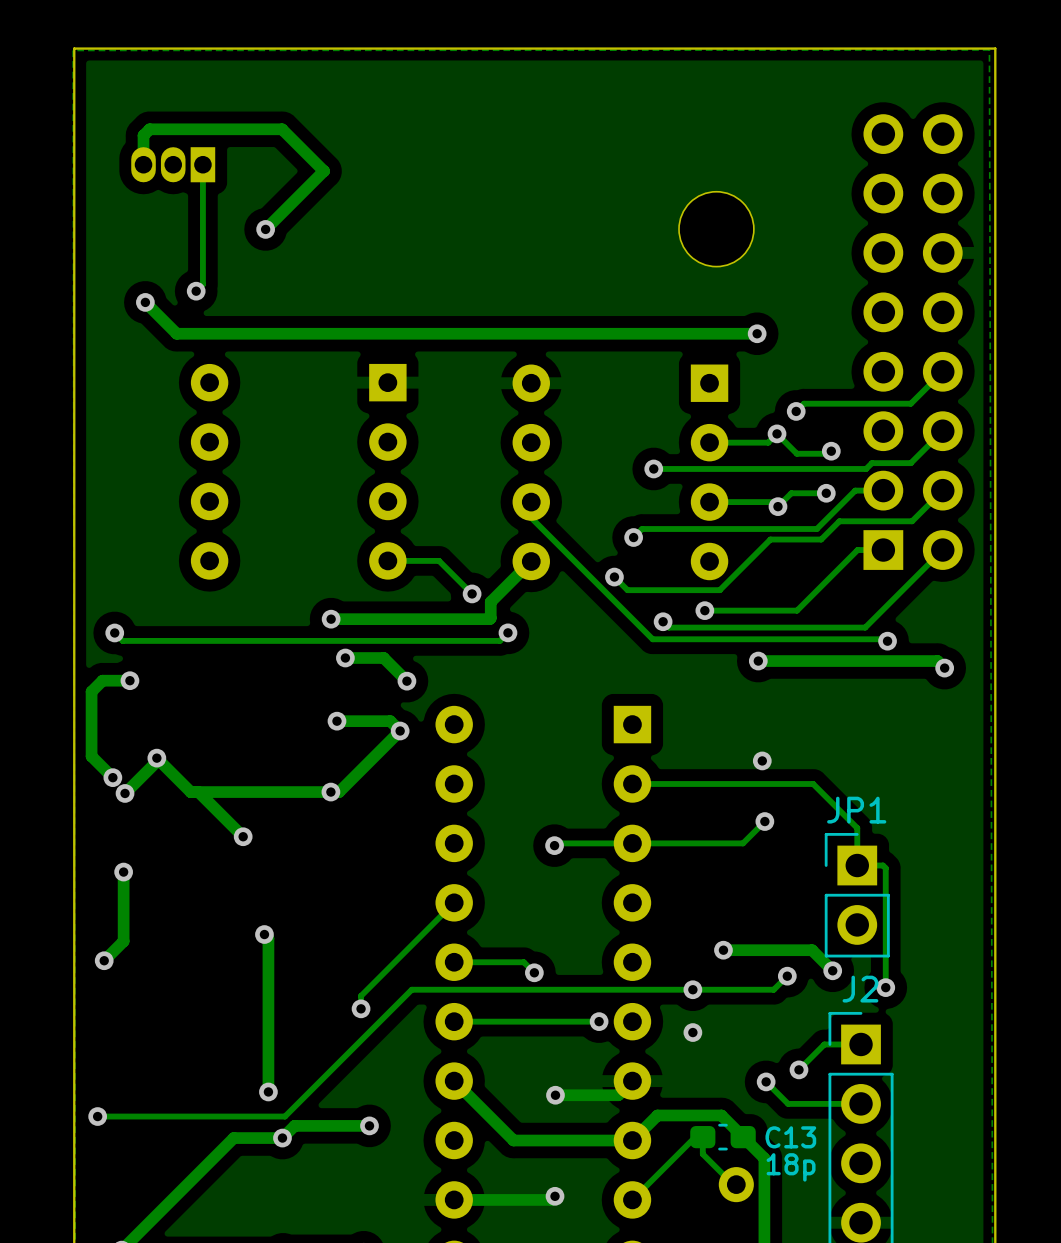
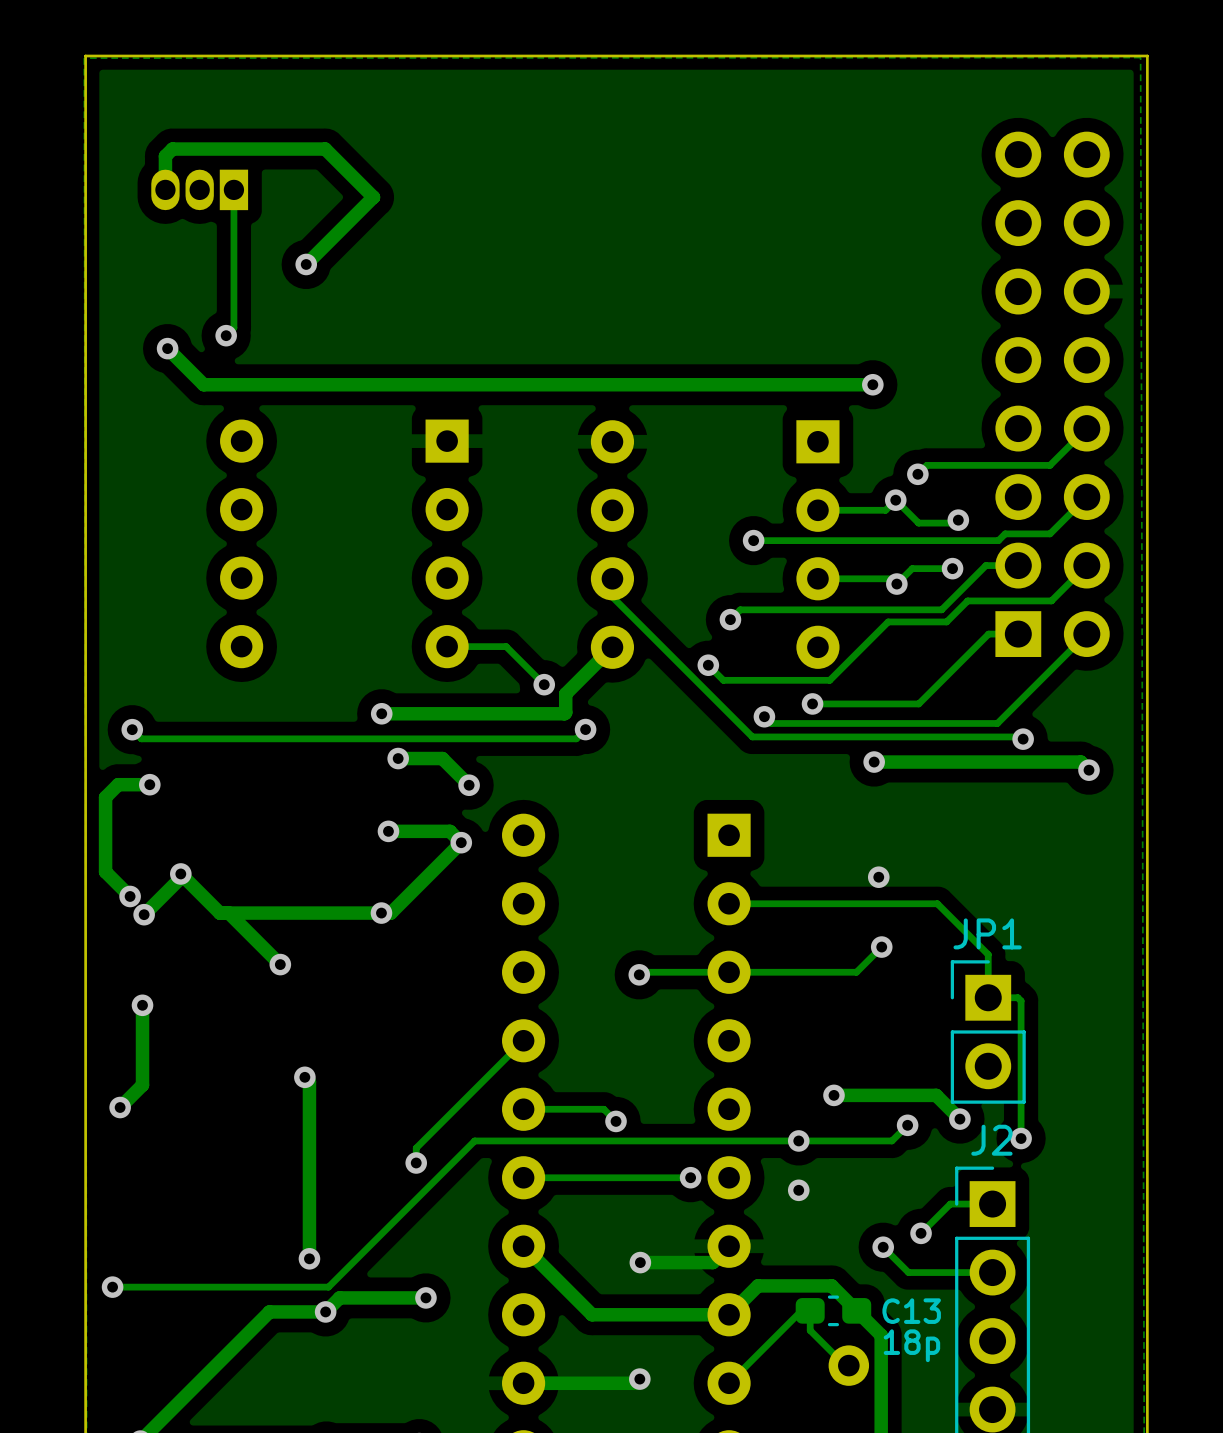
part: (716, 229) -> none

